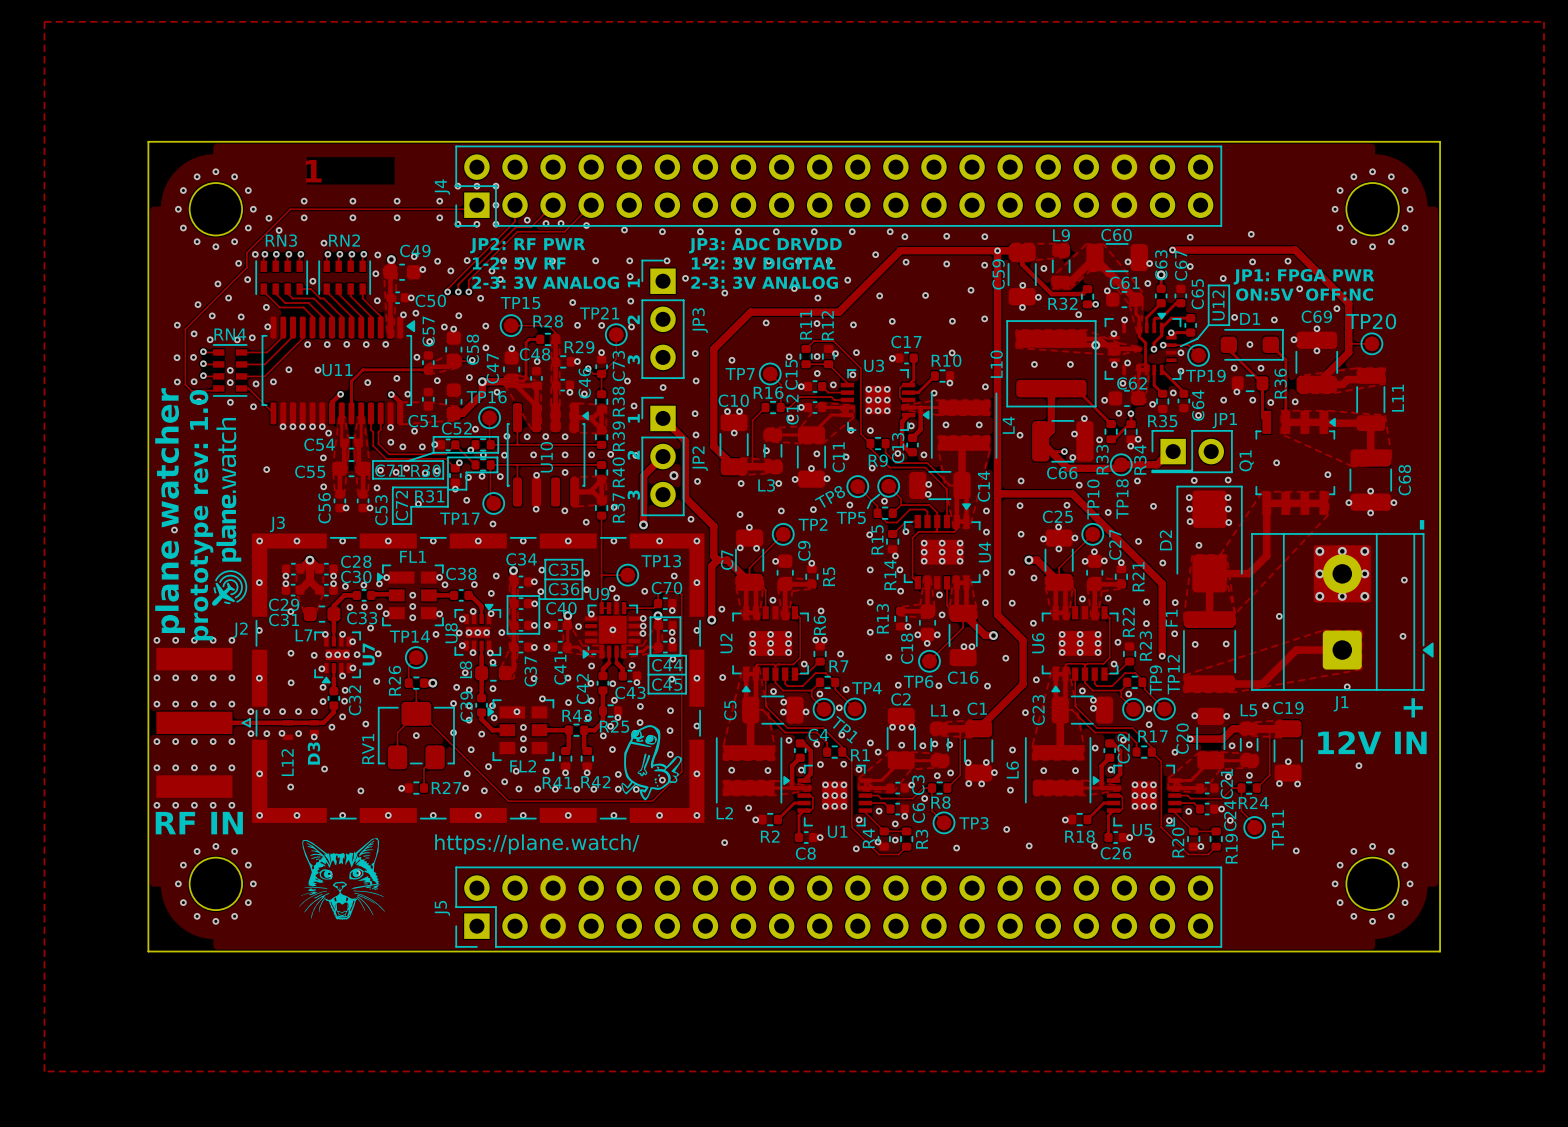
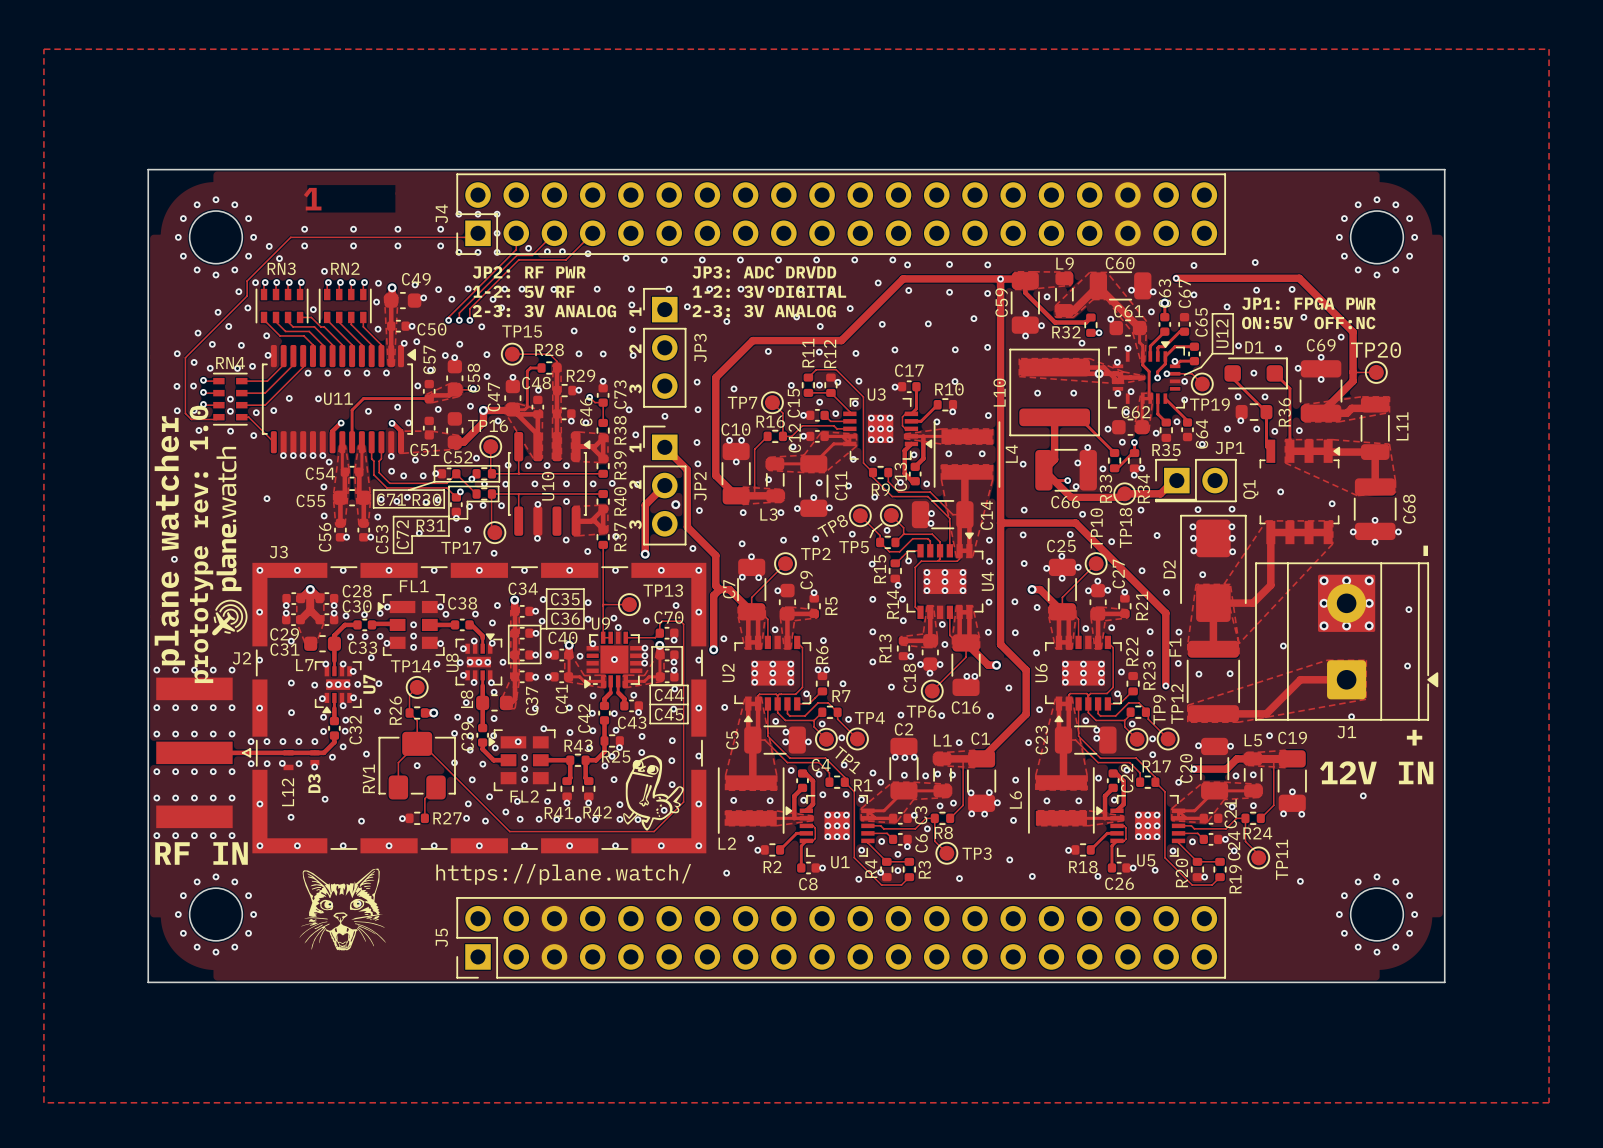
track: (616, 334) (616, 359) (601, 373) -> none
TP21: (616, 334) -> none

